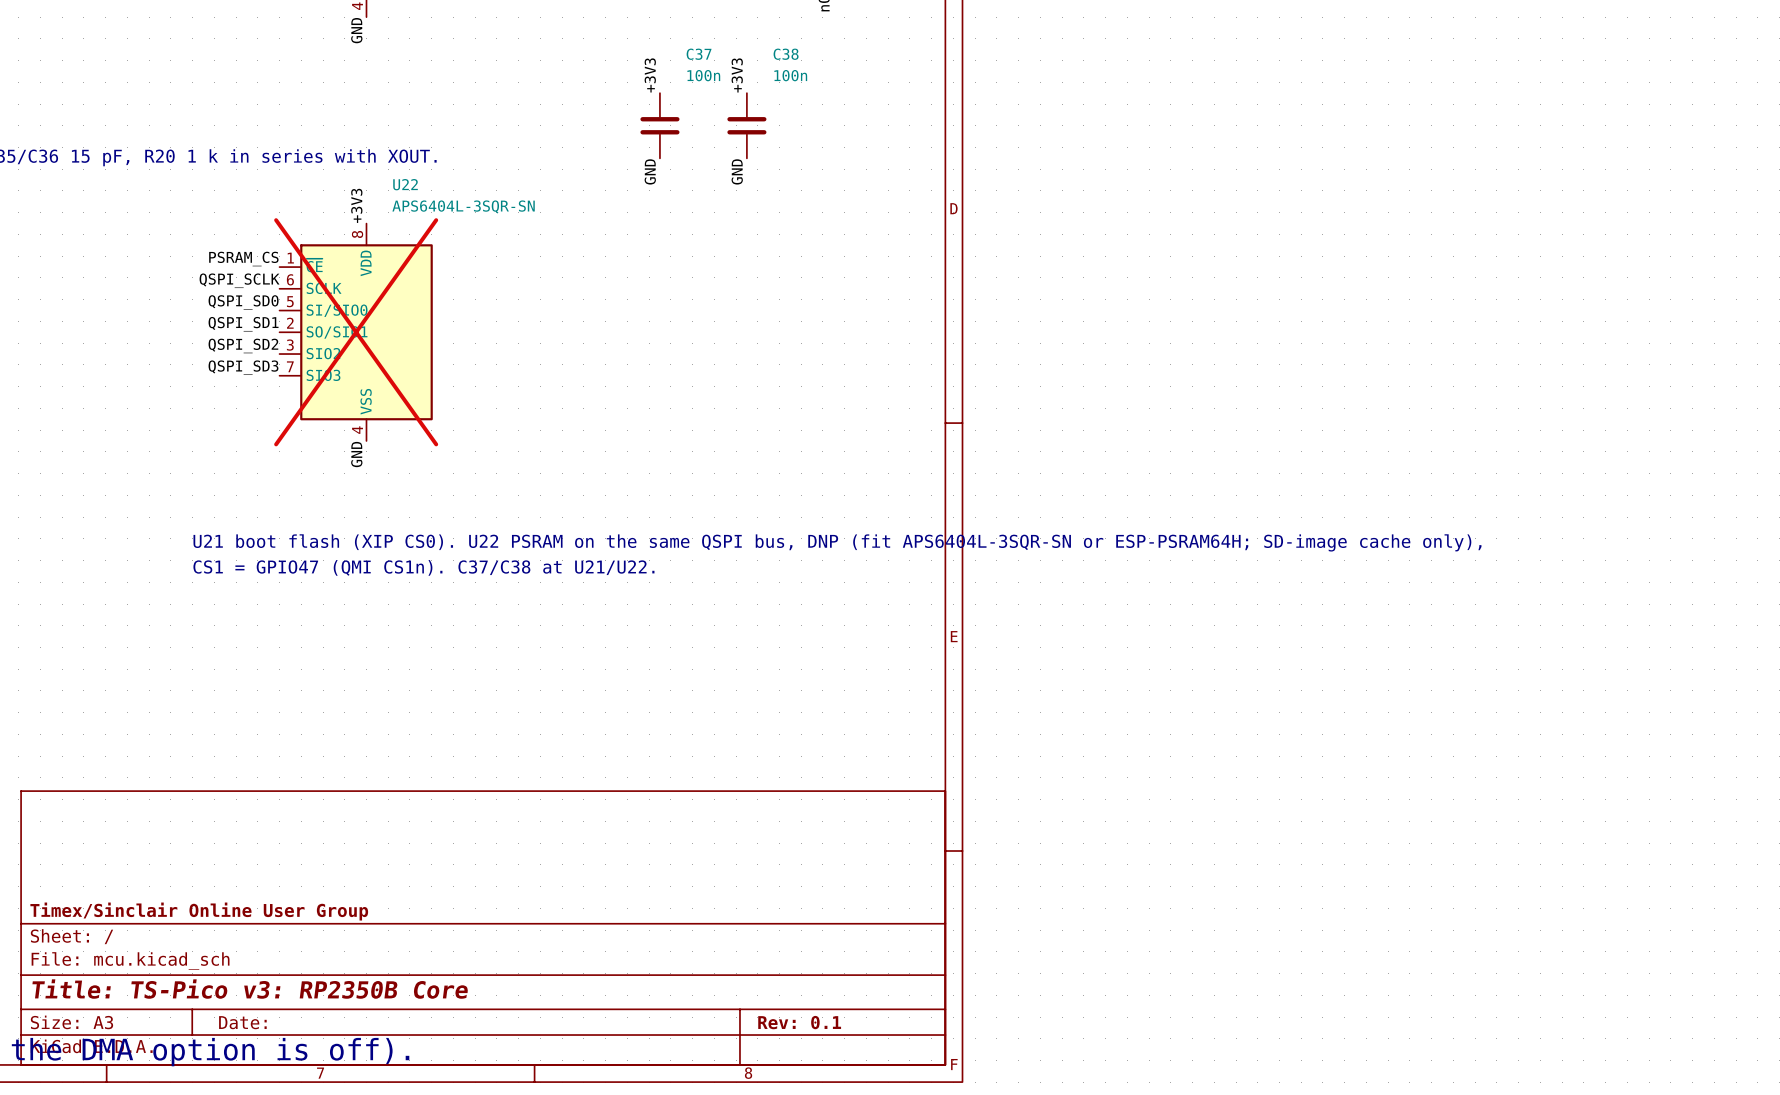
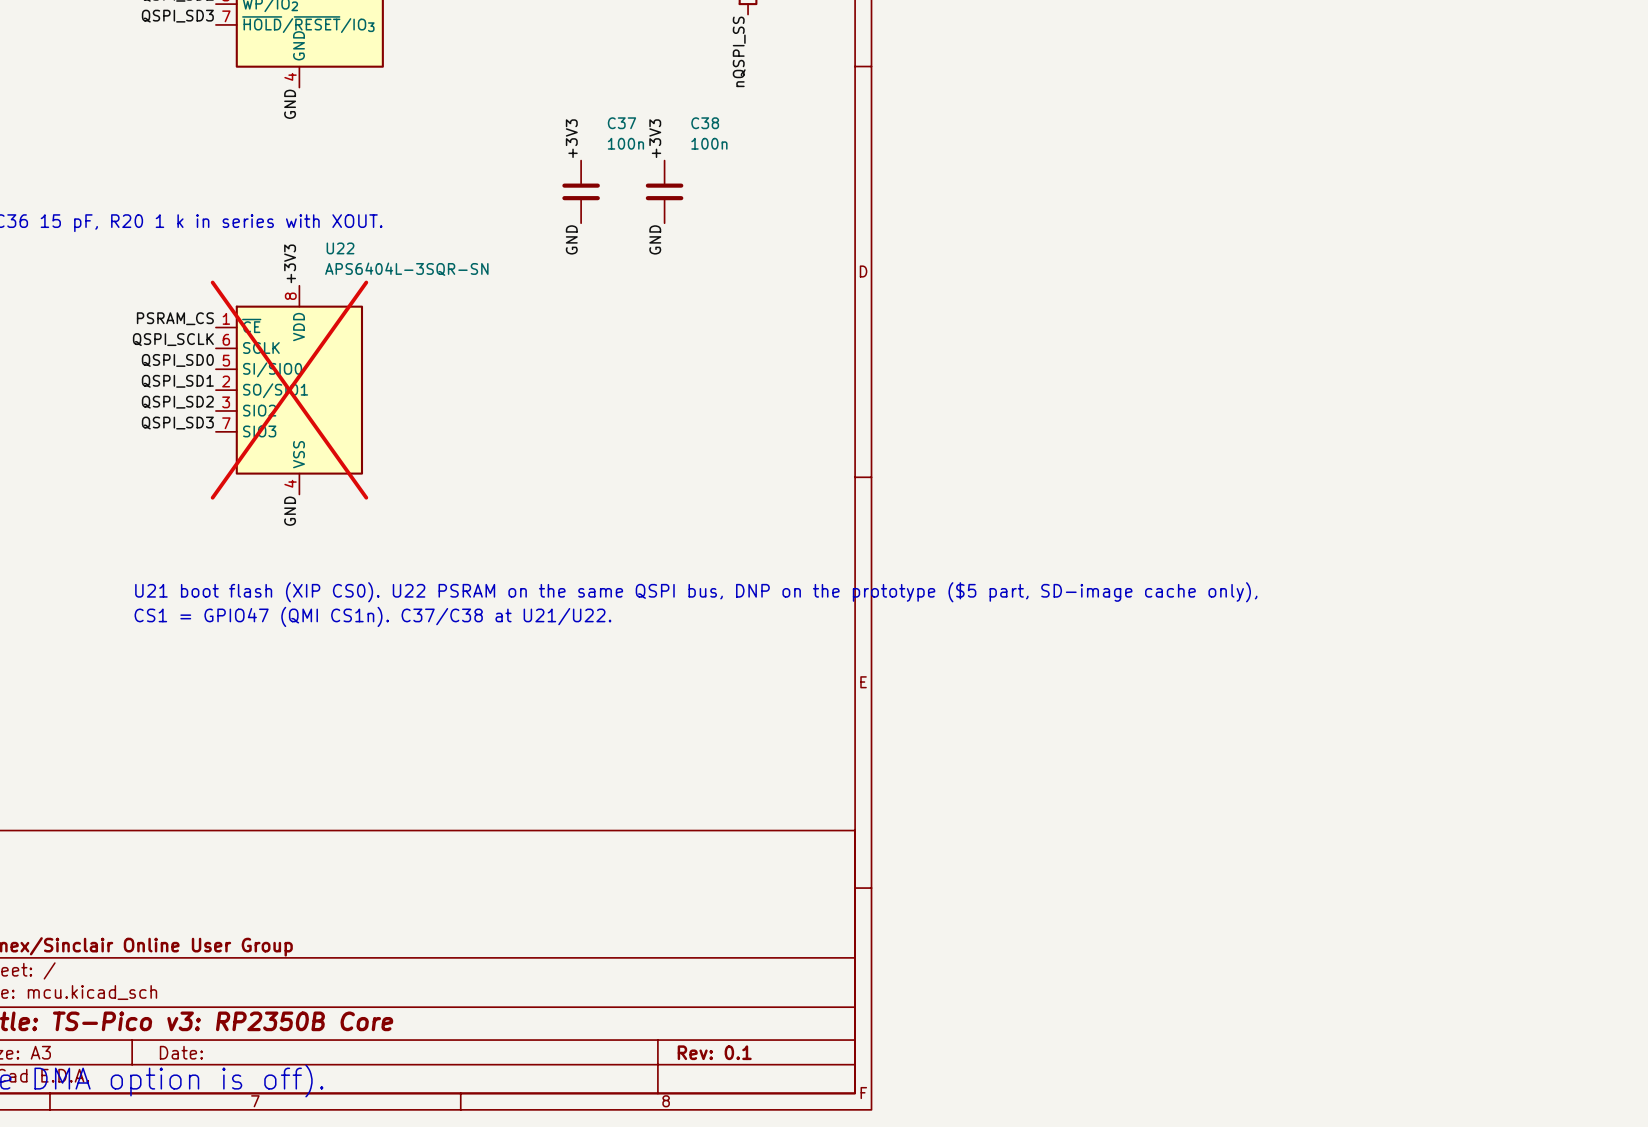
text: U21 boot flash (XIP CS0). U22 PSRAM on the same QSPI bus, DNP (fit APS6404L-3SQR-SN or ESP-PSRAM64H; SD-image cache only), (837, 542) -> U21 boot flash (XIP CS0). U22 PSRAM on the same QSPI bus, DNP on the prototype ($5 part, SD-image cache only), (696, 592)

